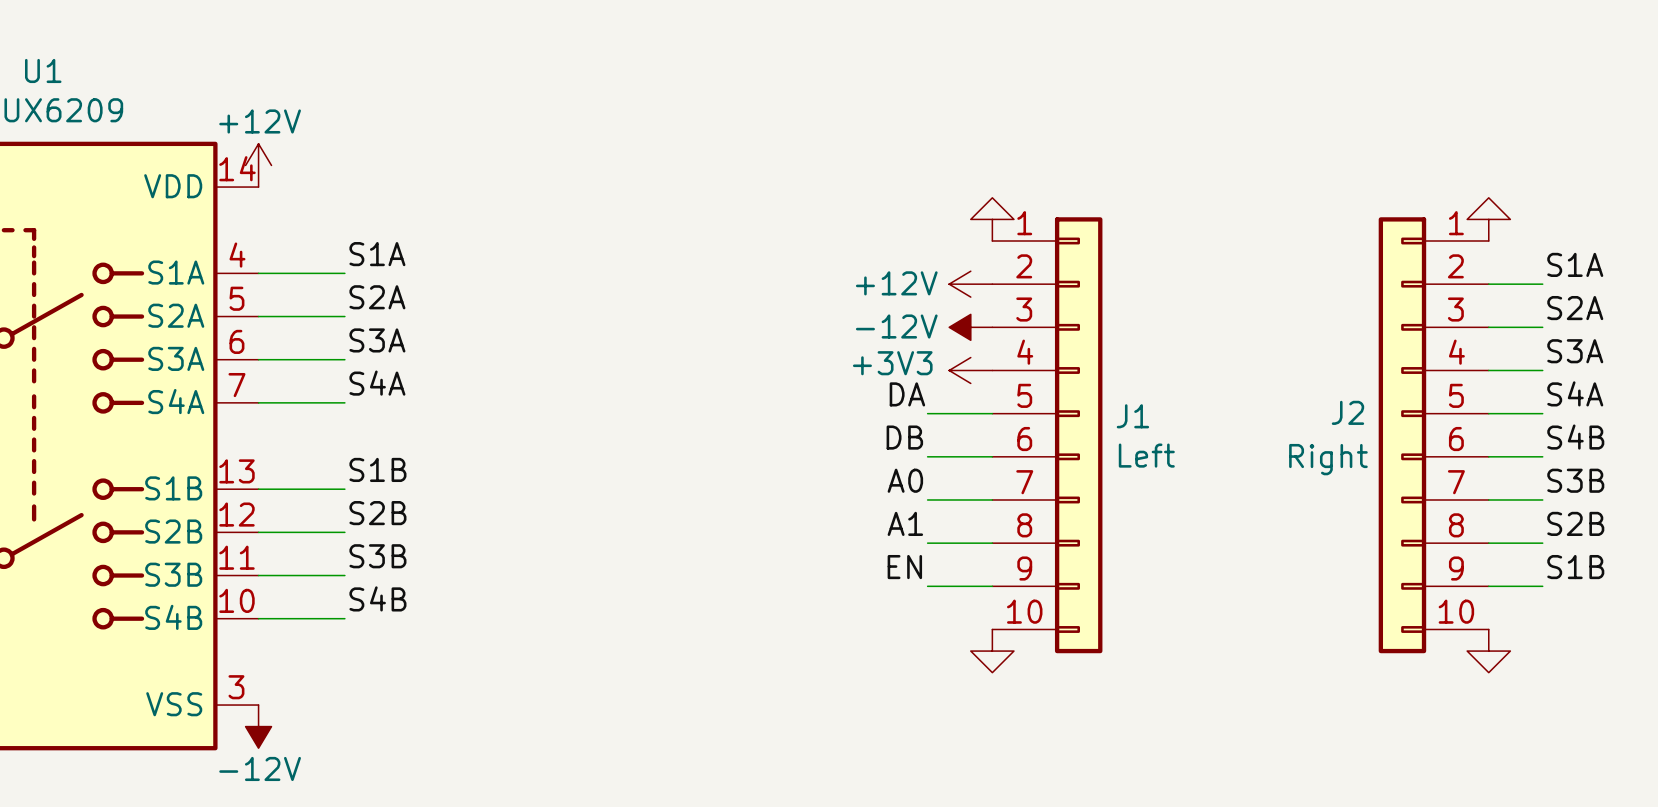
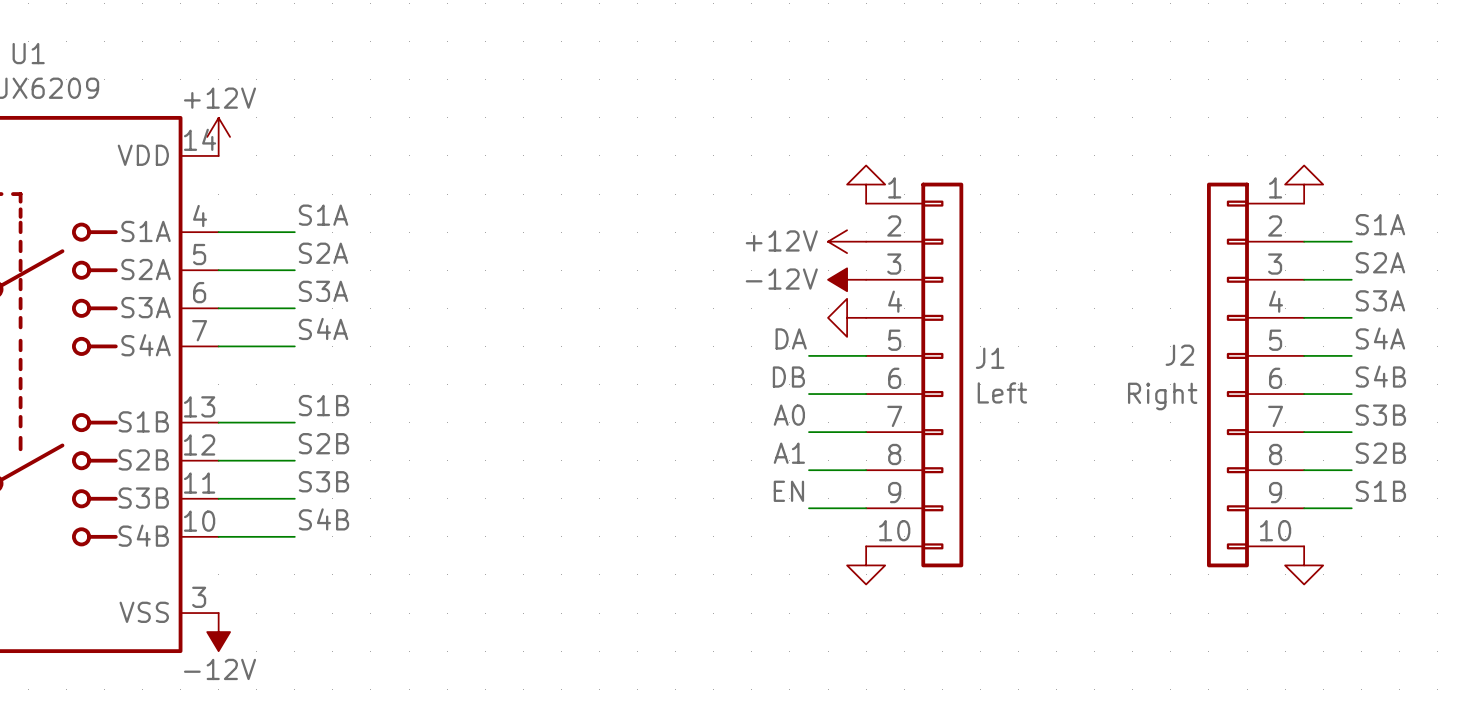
power symbol shape: [949, 357, 993, 384] -> [828, 298, 867, 337]
power symbol text: +3V3 (892, 363) -> none

